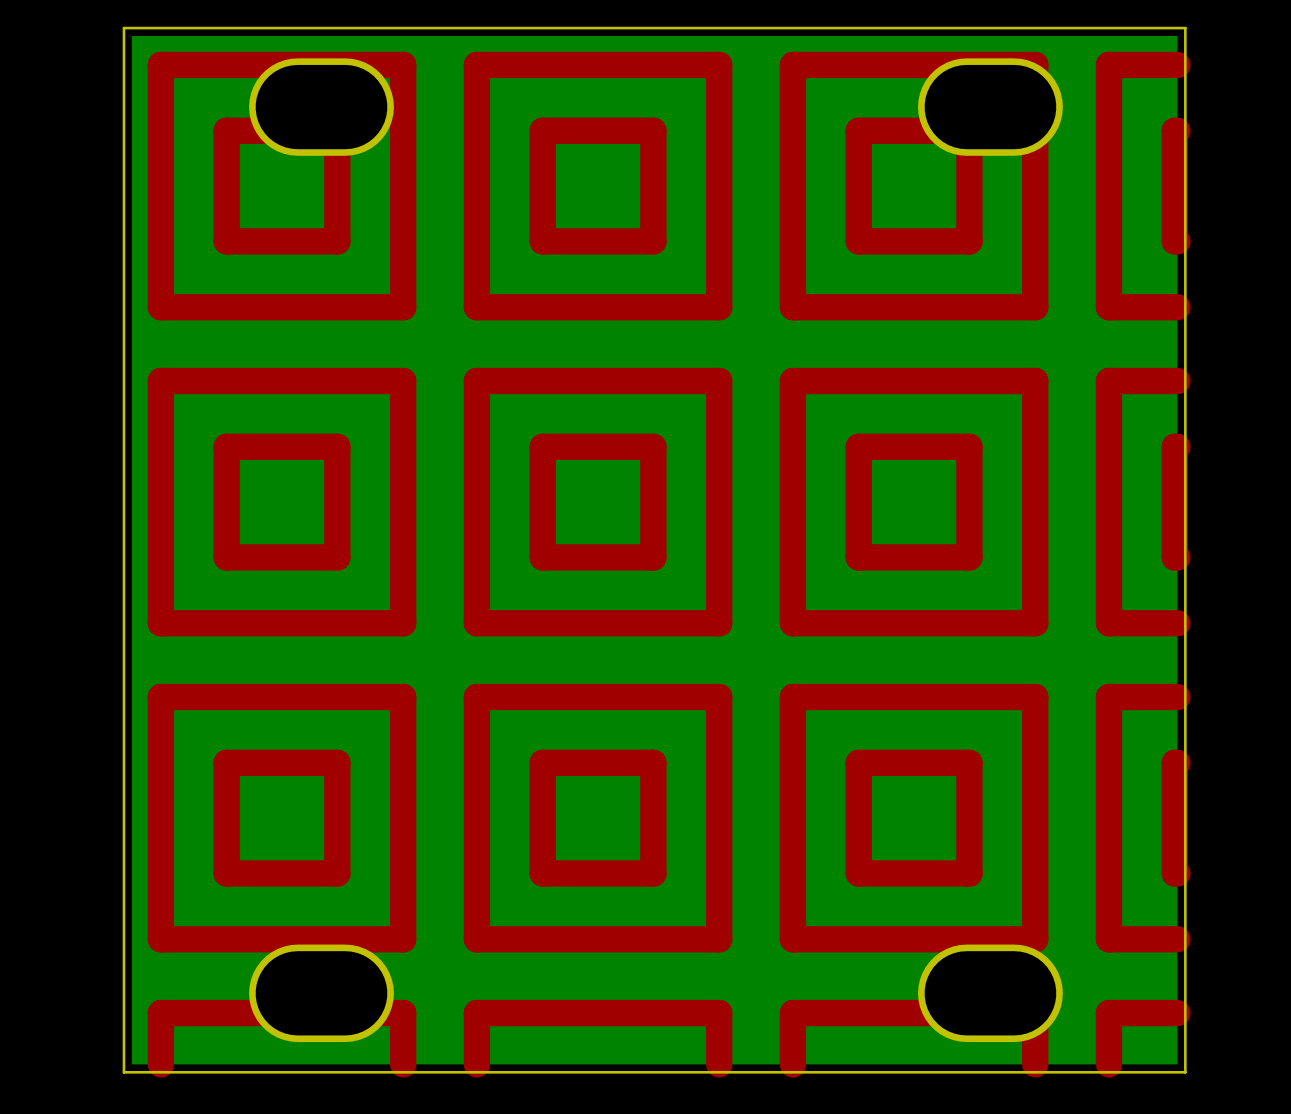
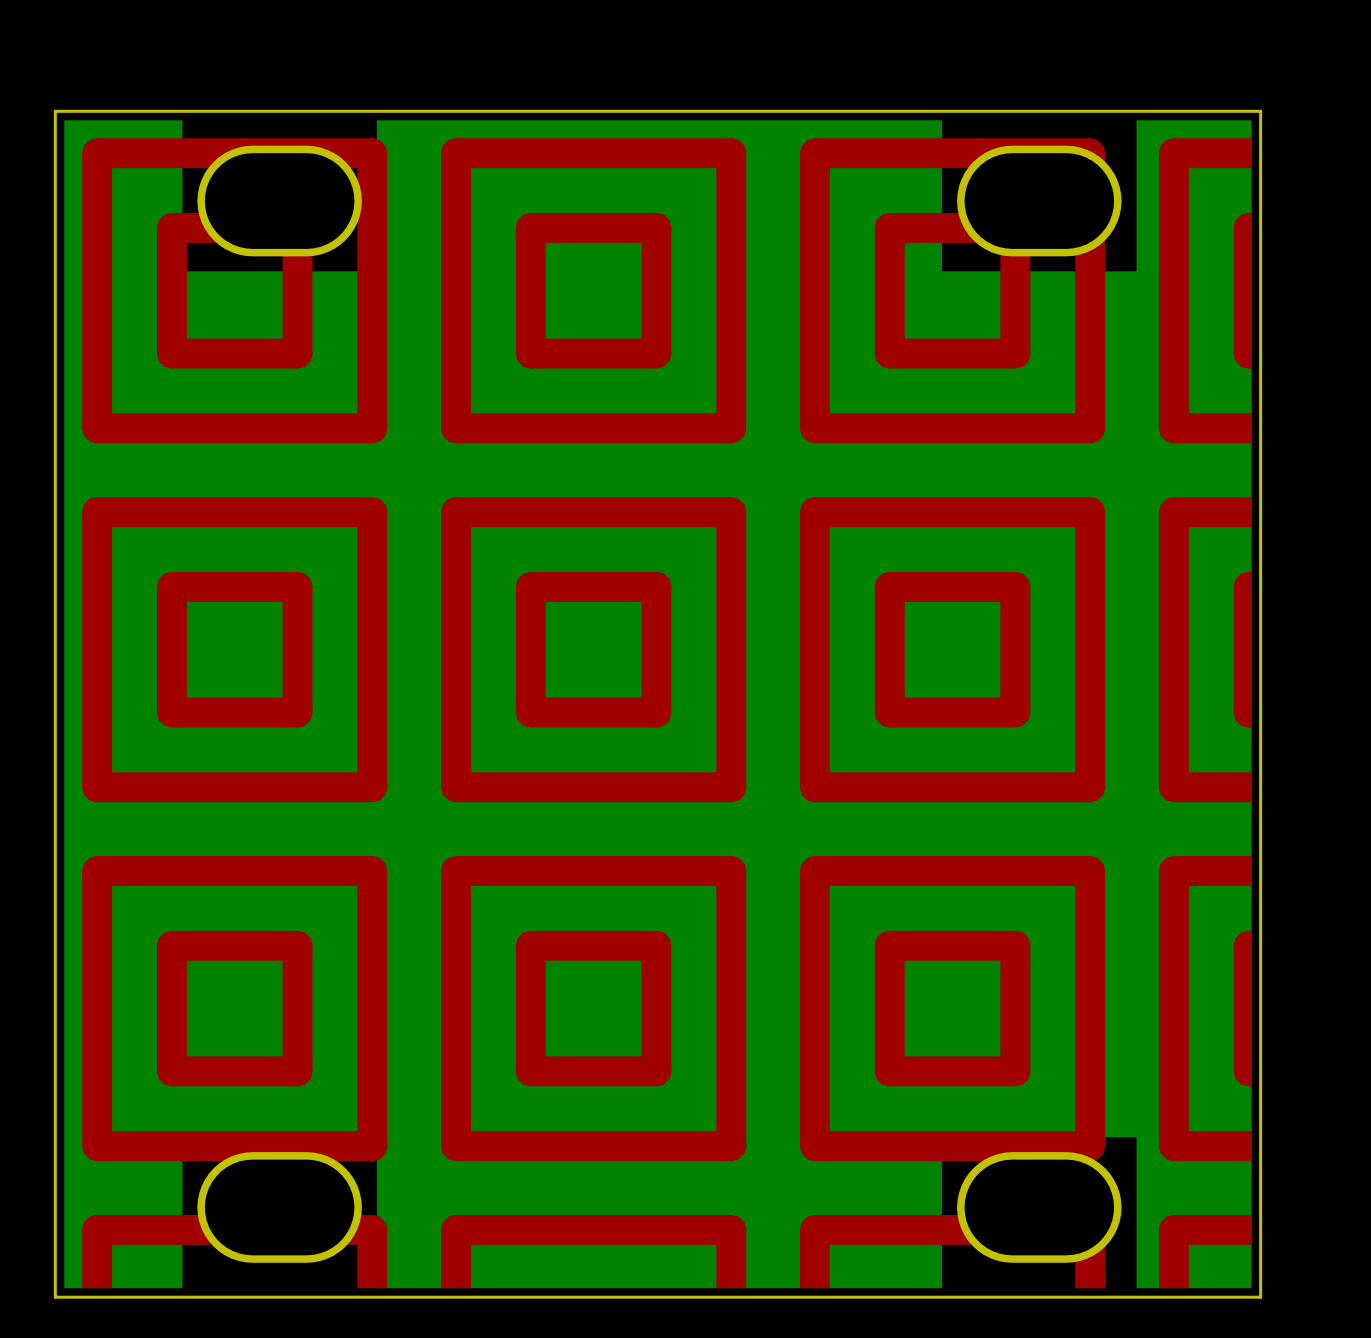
drawing shape: [131, 35, 1178, 1065] -> [182, 271, 1137, 1138]
drawing: none -> [64, 120, 1252, 1289]
top track: (160, 64) (403, 64) (403, 307) (160, 307) (160, 64) -> none
top track: (476, 64) (719, 64) (719, 307) (476, 307) (476, 64) -> none
top track: (792, 64) (1035, 64) (1035, 307) (792, 307) (792, 64) -> none
top track: (1177, 64) (1108, 64) (1108, 307) (1177, 307) -> none
top track: (226, 130) (337, 130) (337, 241) (226, 241) (226, 130) -> none
top track: (542, 130) (653, 130) (653, 241) (542, 241) (542, 130) -> none
top track: (858, 130) (969, 130) (969, 241) (858, 241) (858, 130) -> none
top track: (1177, 130) (1174, 130) (1174, 241) (1177, 241) -> none
drawing: none -> [441, 497, 747, 803]
top track: (160, 380) (160, 623) (403, 623) (403, 380) (160, 380) -> none
top track: (476, 380) (476, 623) (719, 623) (719, 380) (476, 380) -> none
top track: (792, 380) (792, 623) (1035, 623) (1035, 380) (792, 380) -> none
top track: (1177, 380) (1108, 380) (1108, 623) (1177, 623) -> none
drawing: none -> [515, 571, 672, 728]
drawing: none -> [874, 571, 1031, 728]
top track: (226, 446) (226, 557) (337, 557) (337, 446) (226, 446) -> none
top track: (542, 446) (542, 557) (653, 557) (653, 446) (542, 446) -> none
top track: (858, 446) (858, 557) (969, 557) (969, 446) (858, 446) -> none
top track: (1177, 446) (1174, 446) (1174, 557) (1177, 557) -> none
top track: (160, 697) (160, 939) (403, 939) (403, 697) (160, 697) -> none
top track: (476, 697) (476, 939) (719, 939) (719, 697) (476, 697) -> none
top track: (792, 697) (792, 939) (1035, 939) (1035, 697) (792, 697) -> none
top track: (1177, 697) (1108, 697) (1108, 939) (1177, 939) -> none
drawing: none -> [515, 930, 672, 1087]
drawing: none -> [874, 930, 1031, 1087]
top track: (226, 762) (226, 873) (337, 873) (337, 762) (226, 762) -> none
top track: (542, 762) (542, 873) (653, 873) (653, 762) (542, 762) -> none
top track: (858, 762) (858, 873) (969, 873) (969, 762) (858, 762) -> none
top track: (1177, 762) (1174, 762) (1174, 873) (1177, 873) -> none
top track: (1177, 1013) (1108, 1013) (1108, 1064) -> none
top track: (160, 1064) (160, 1013) (403, 1013) (403, 1064) -> none
top track: (476, 1064) (476, 1013) (719, 1013) (719, 1064) -> none
top track: (792, 1064) (792, 1013) (1035, 1013) (1035, 1064) -> none

